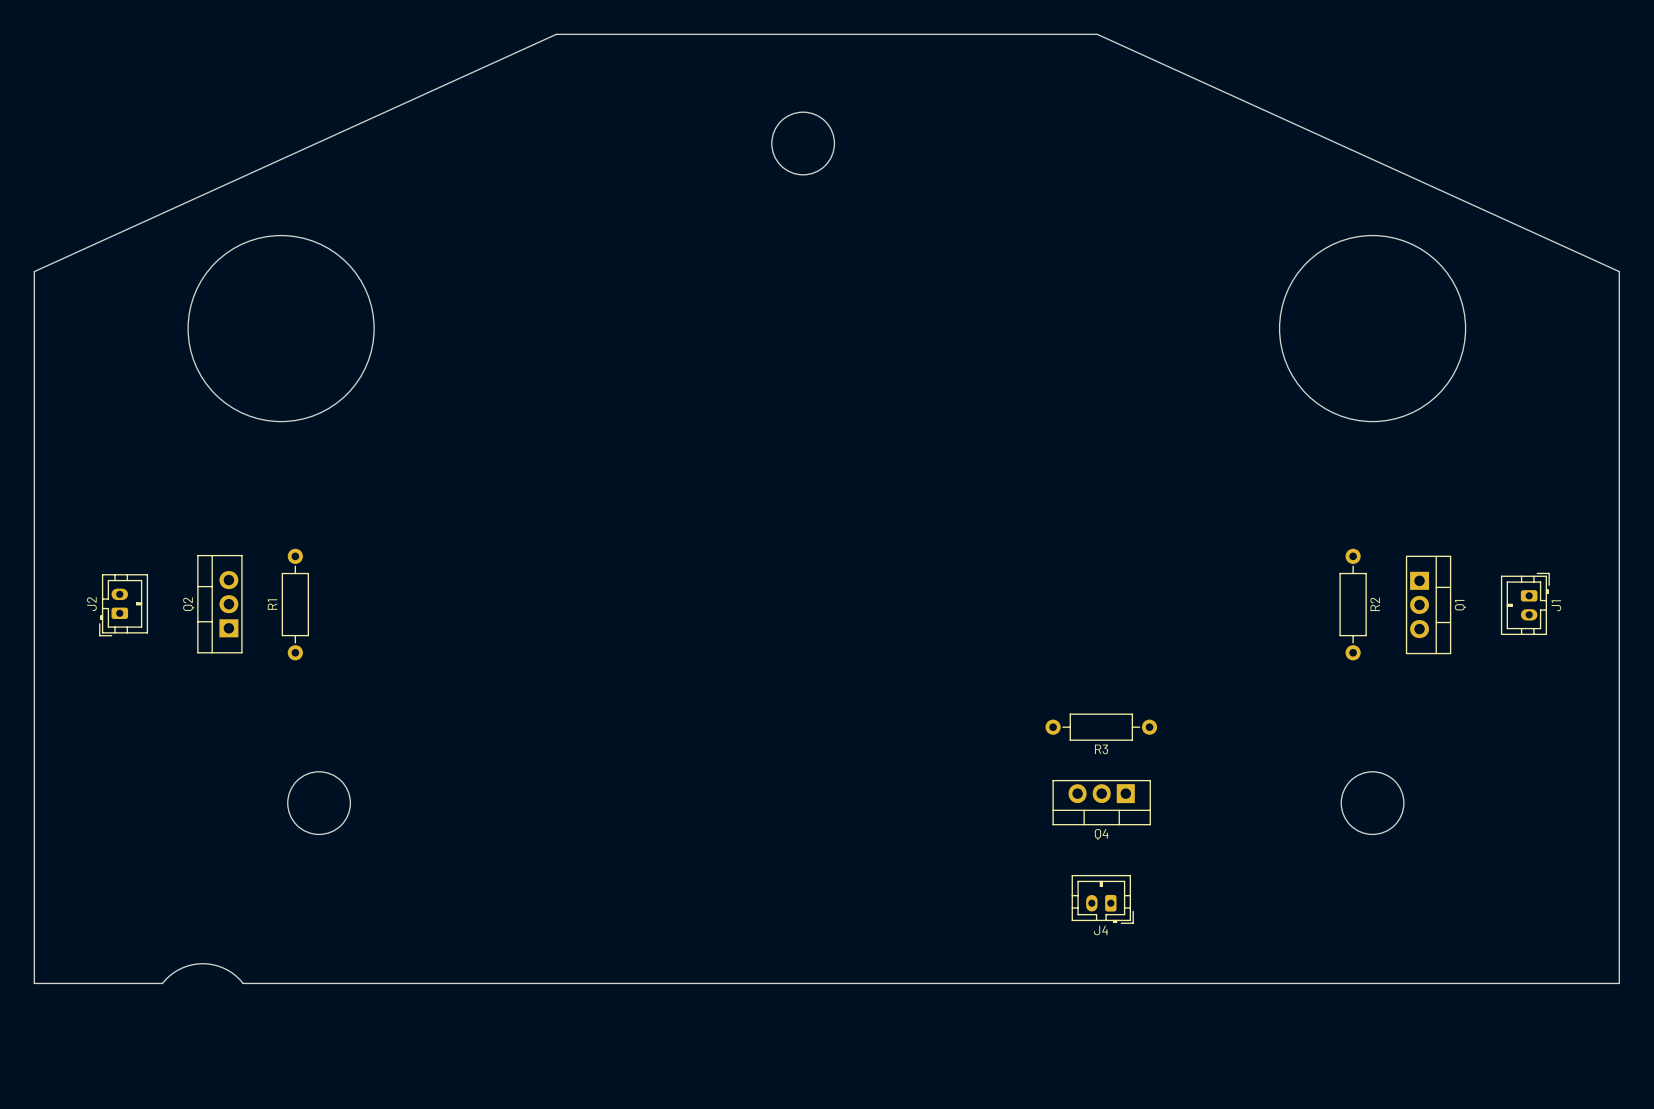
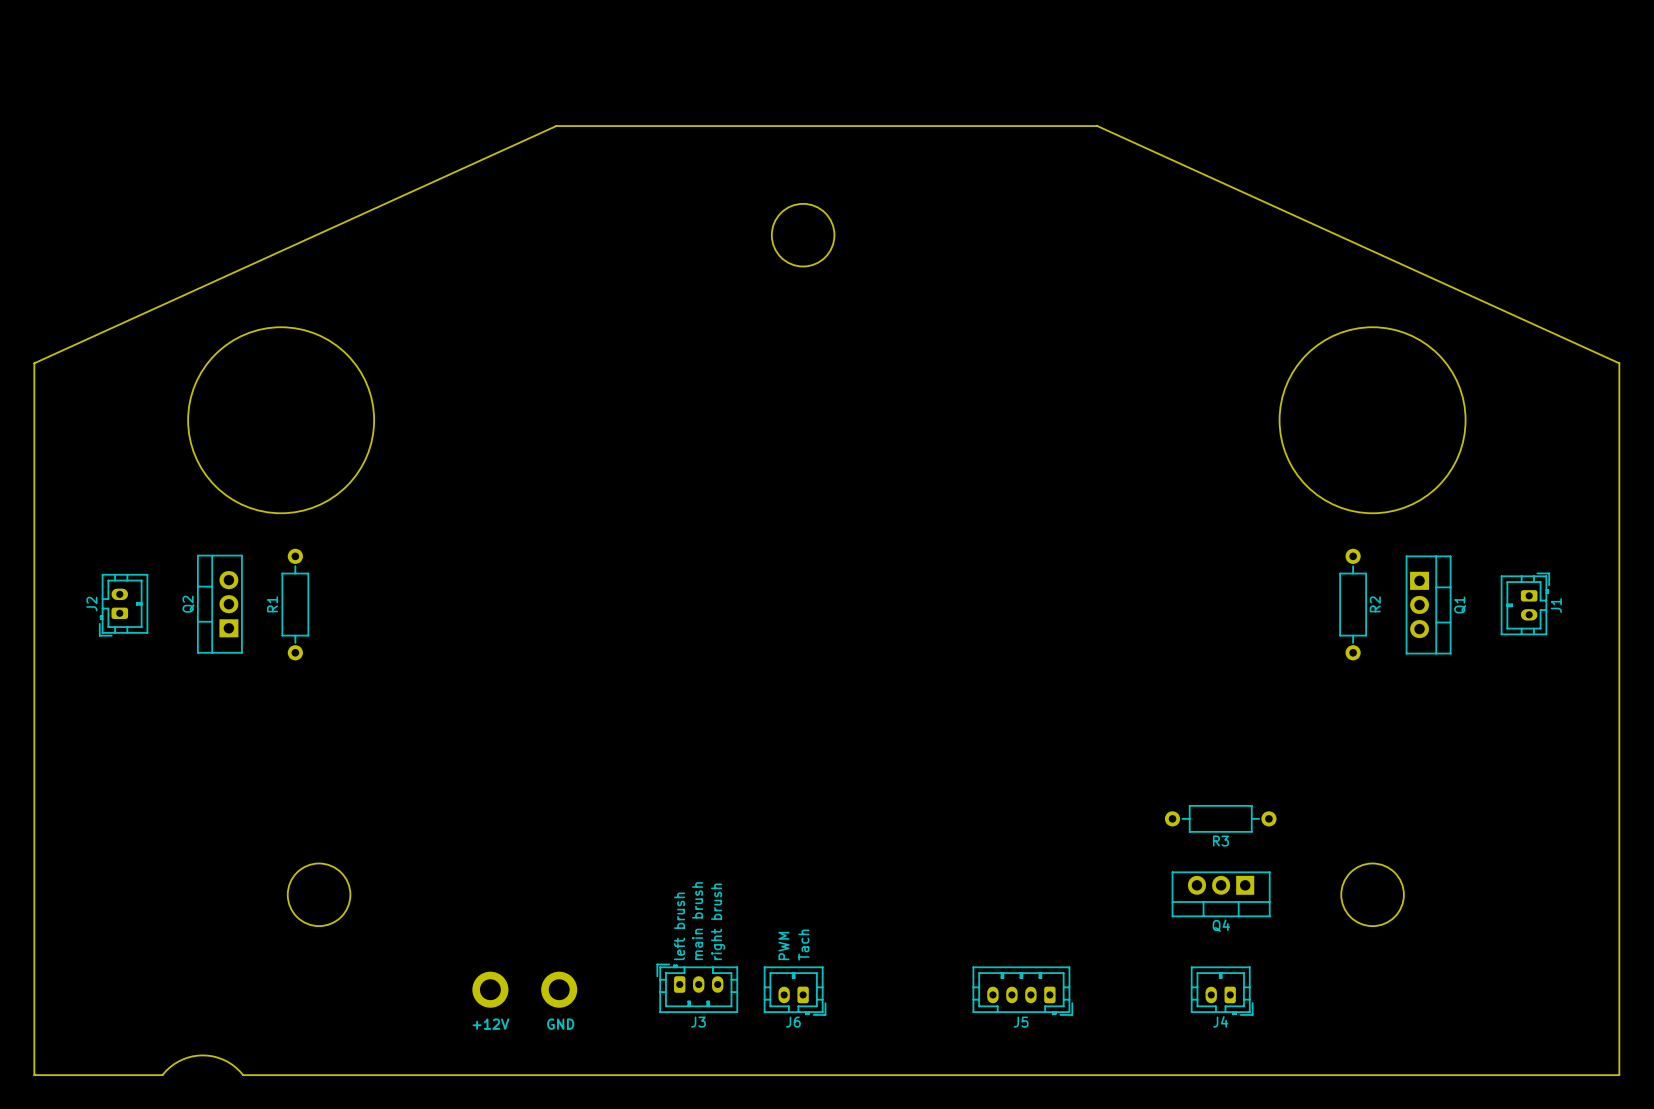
round board edge position: (803, 143) -> (803, 235)
round board edge position: (281, 328) -> (281, 420)
round board edge position: (1372, 328) -> (1372, 420)
board edge: (34, 363) (34, 271) (556, 34) (1097, 34) (1619, 271) (1619, 363) -> (34, 363) (556, 126) (1097, 126) (1619, 363)
R3 position: (1101, 727) -> (1220, 818)
Q4 position: (1101, 802) -> (1221, 894)
round board edge position: (319, 803) -> (319, 894)
round board edge position: (1372, 803) -> (1372, 894)
J4 position: (1102, 899) -> (1222, 991)
text: none -> main brush (697, 921)
text: none -> right brush (718, 921)
text: none -> left brush (679, 926)
text: none -> Tach (803, 945)
text: none -> PWM (783, 945)
board edge: (34, 983) (162, 983) (178, 970) (192, 964) (202, 963) (222, 967) (231, 972) (243, 983) (1619, 983) -> (34, 983) (34, 1075) (162, 1075) (178, 1061) (192, 1056) (202, 1055) (222, 1059) (236, 1067) (243, 1075) (1619, 1075) (1619, 983)
J3: none -> (697, 988)
part: none -> (490, 989)
part: none -> (559, 989)
J6: none -> (795, 991)
J5: none -> (1022, 991)
text: none -> +12V (490, 1024)
text: none -> GND (560, 1024)

